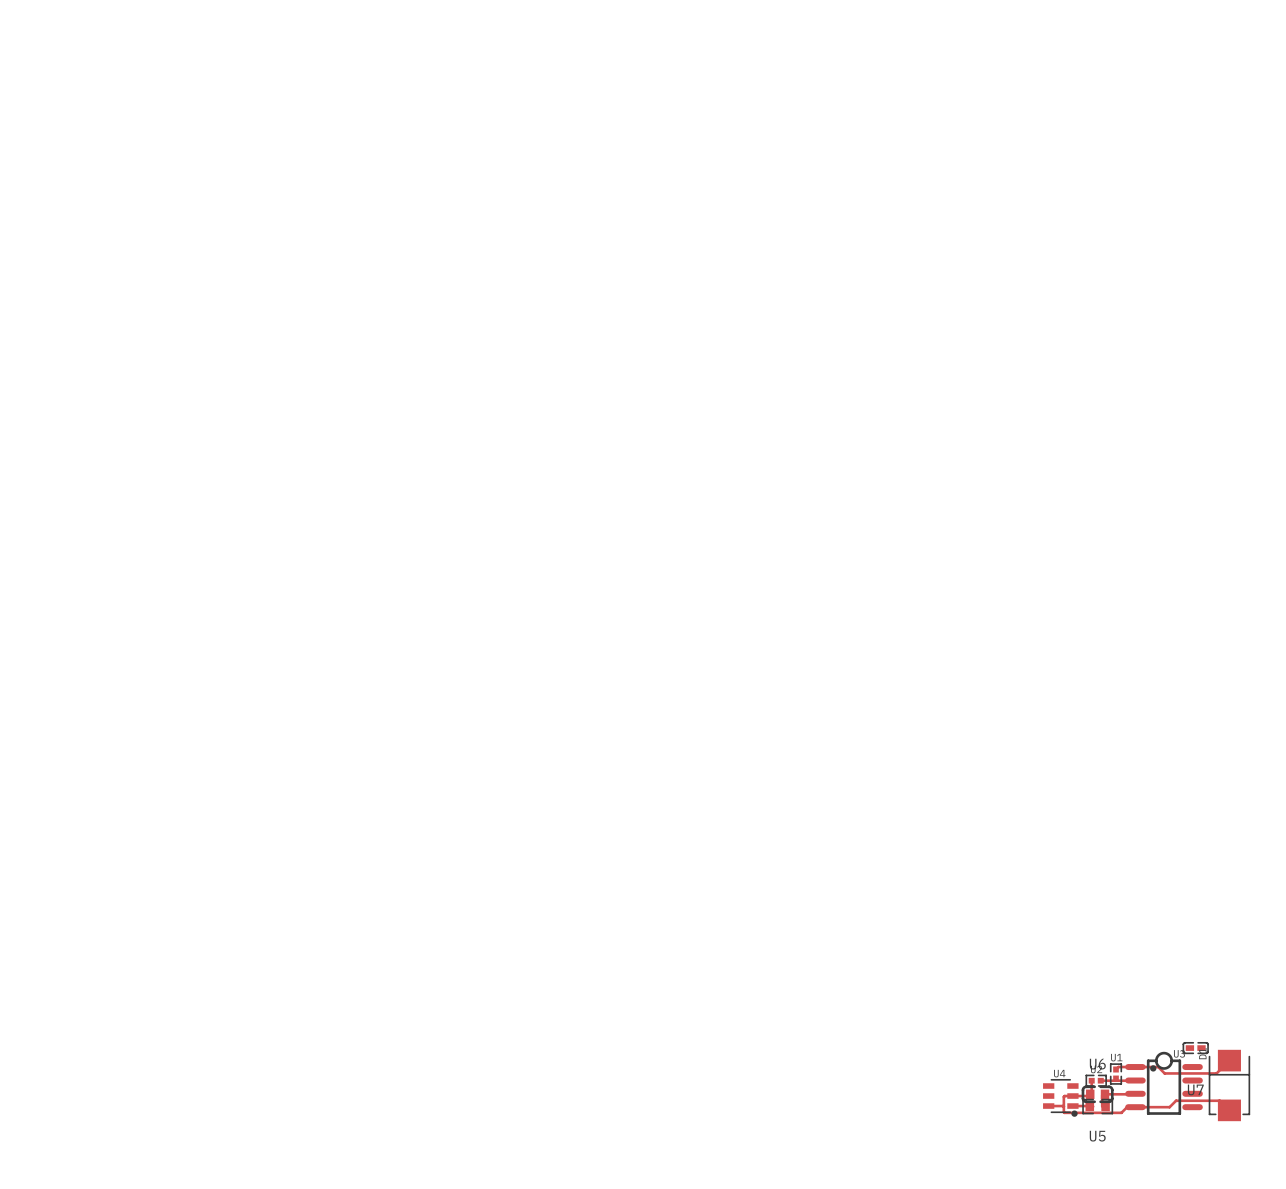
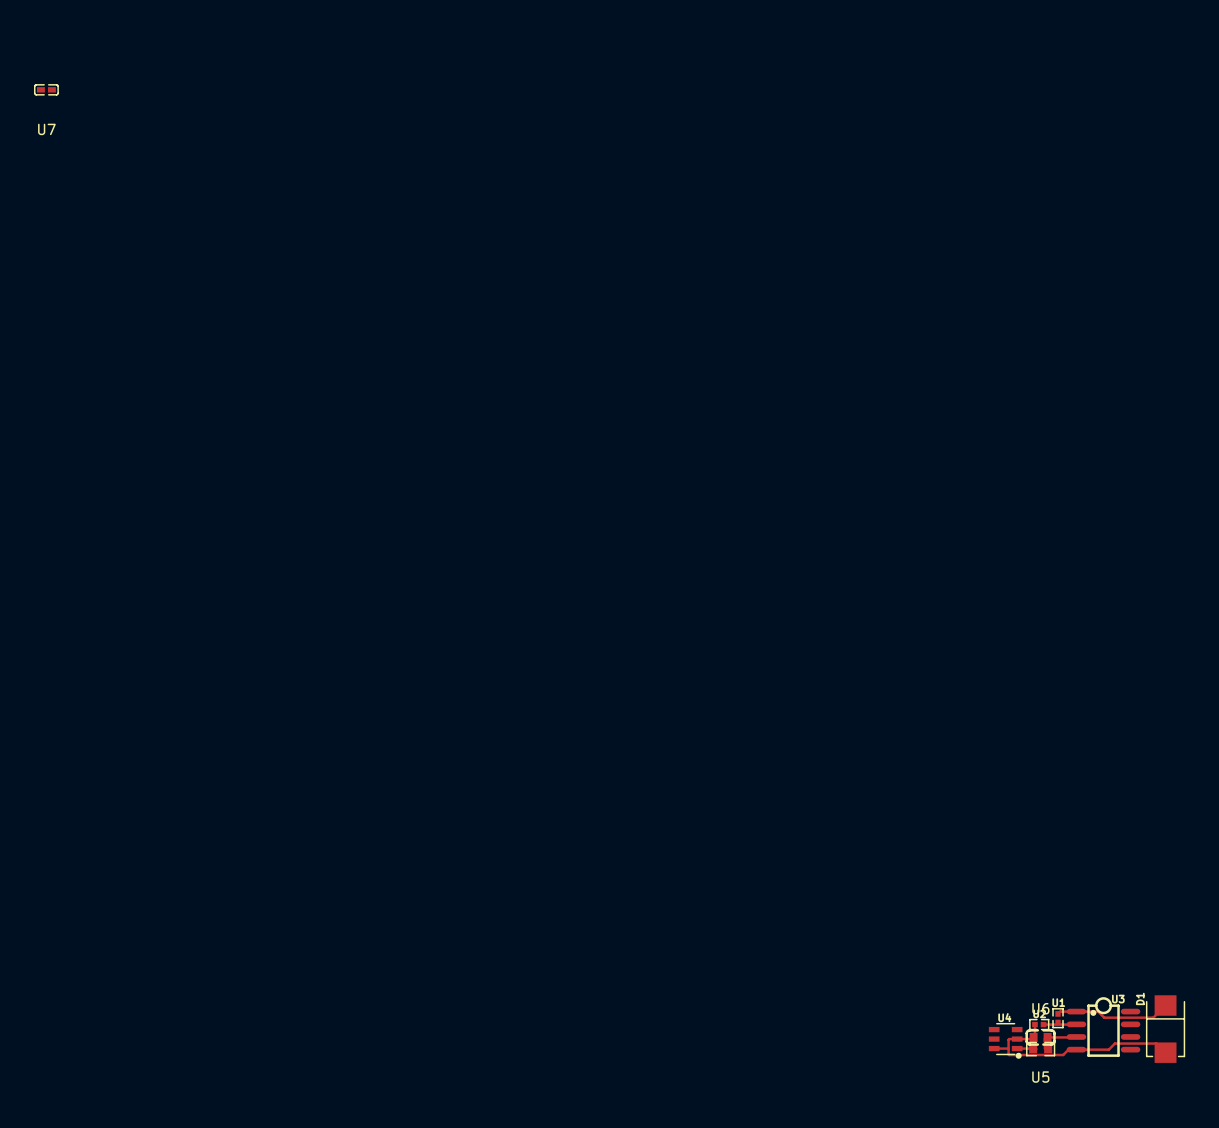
U7 position: (1195, 1048) -> (46, 89)

